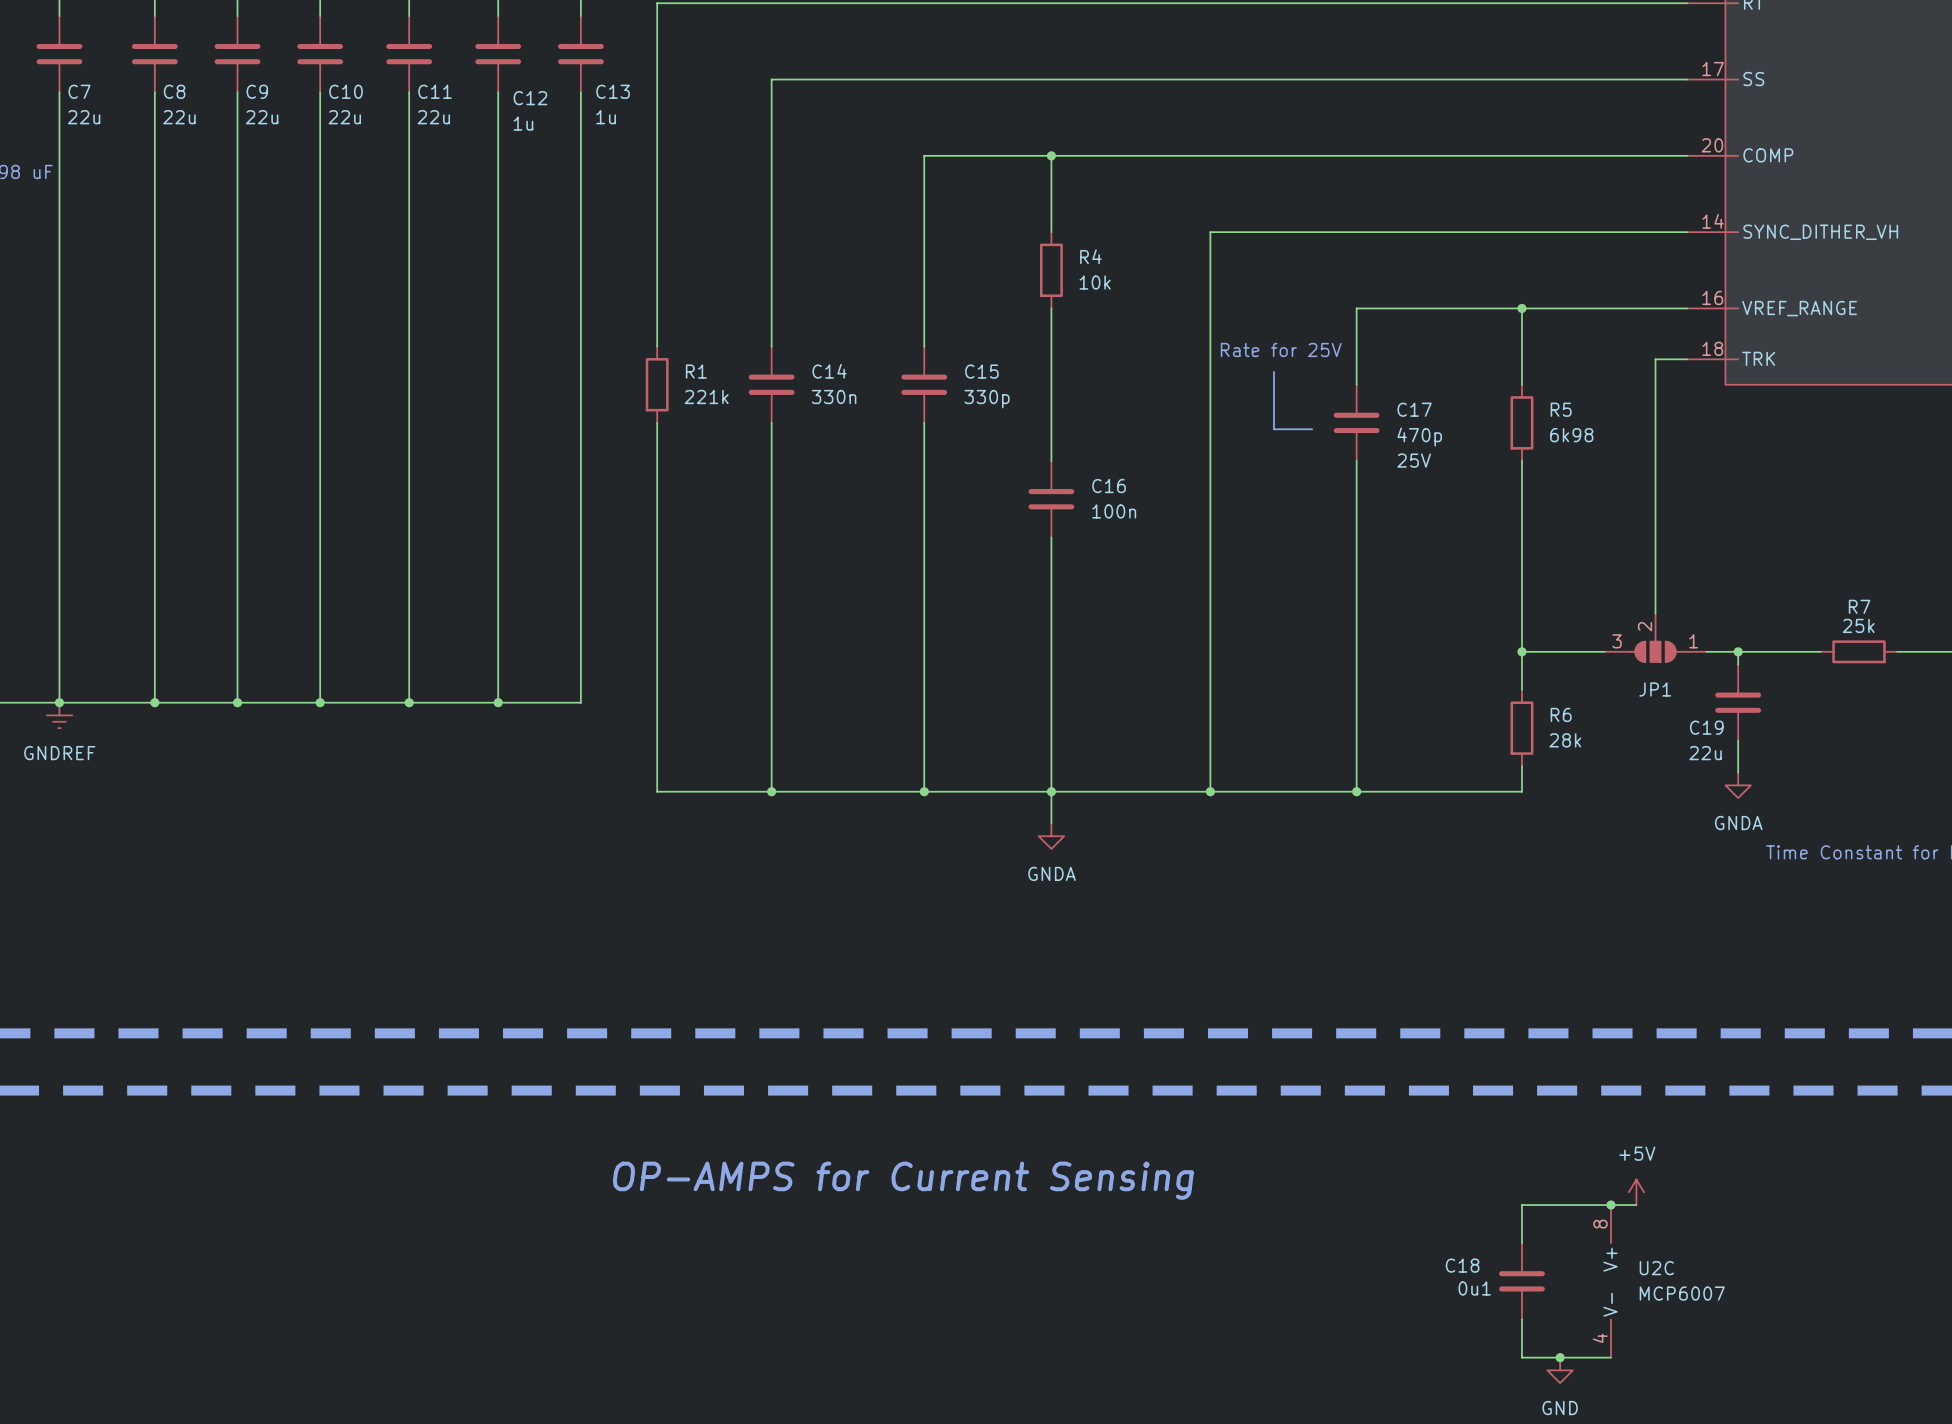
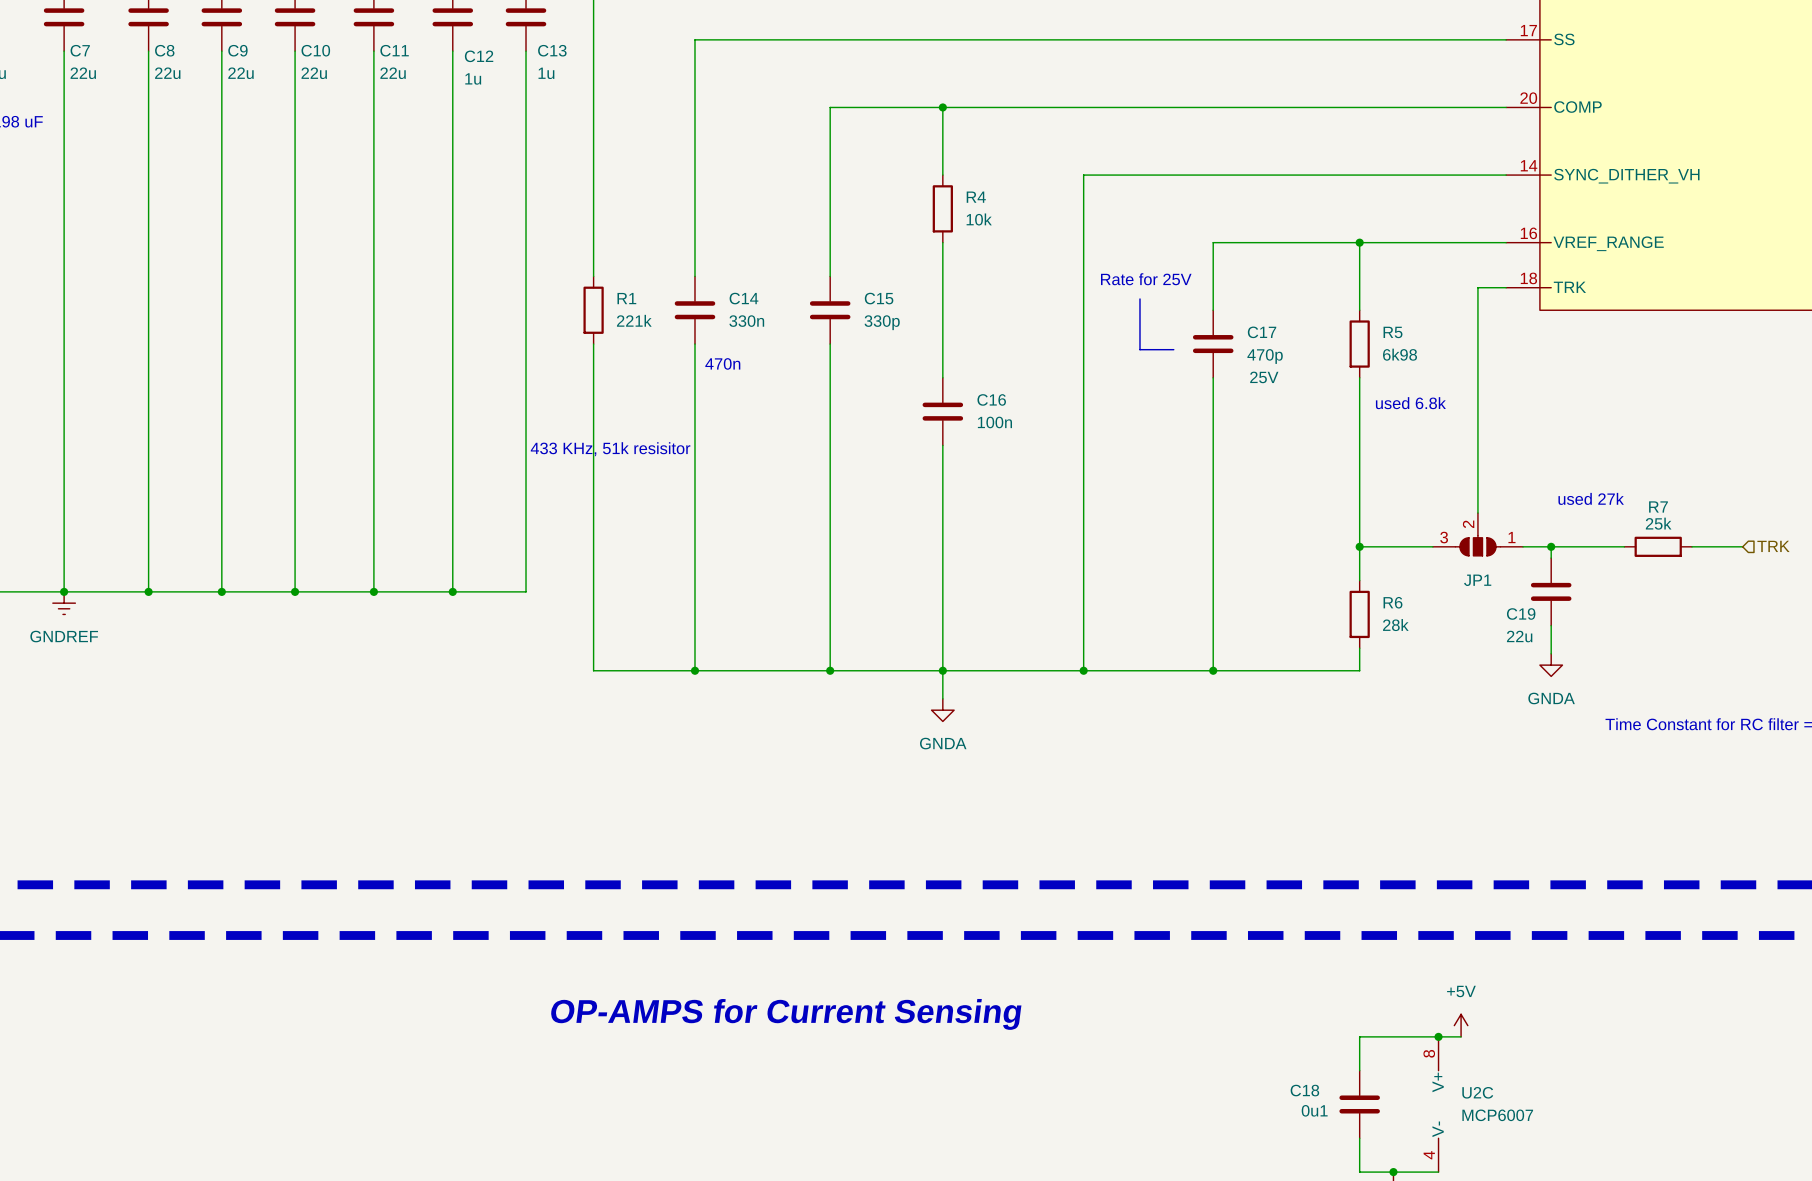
text: none -> 470n (722, 363)
text: none -> used 6.8k (1410, 403)
text: none -> 433 KHz, 51k resisitor (610, 449)
text: none -> used 27k (1591, 498)

